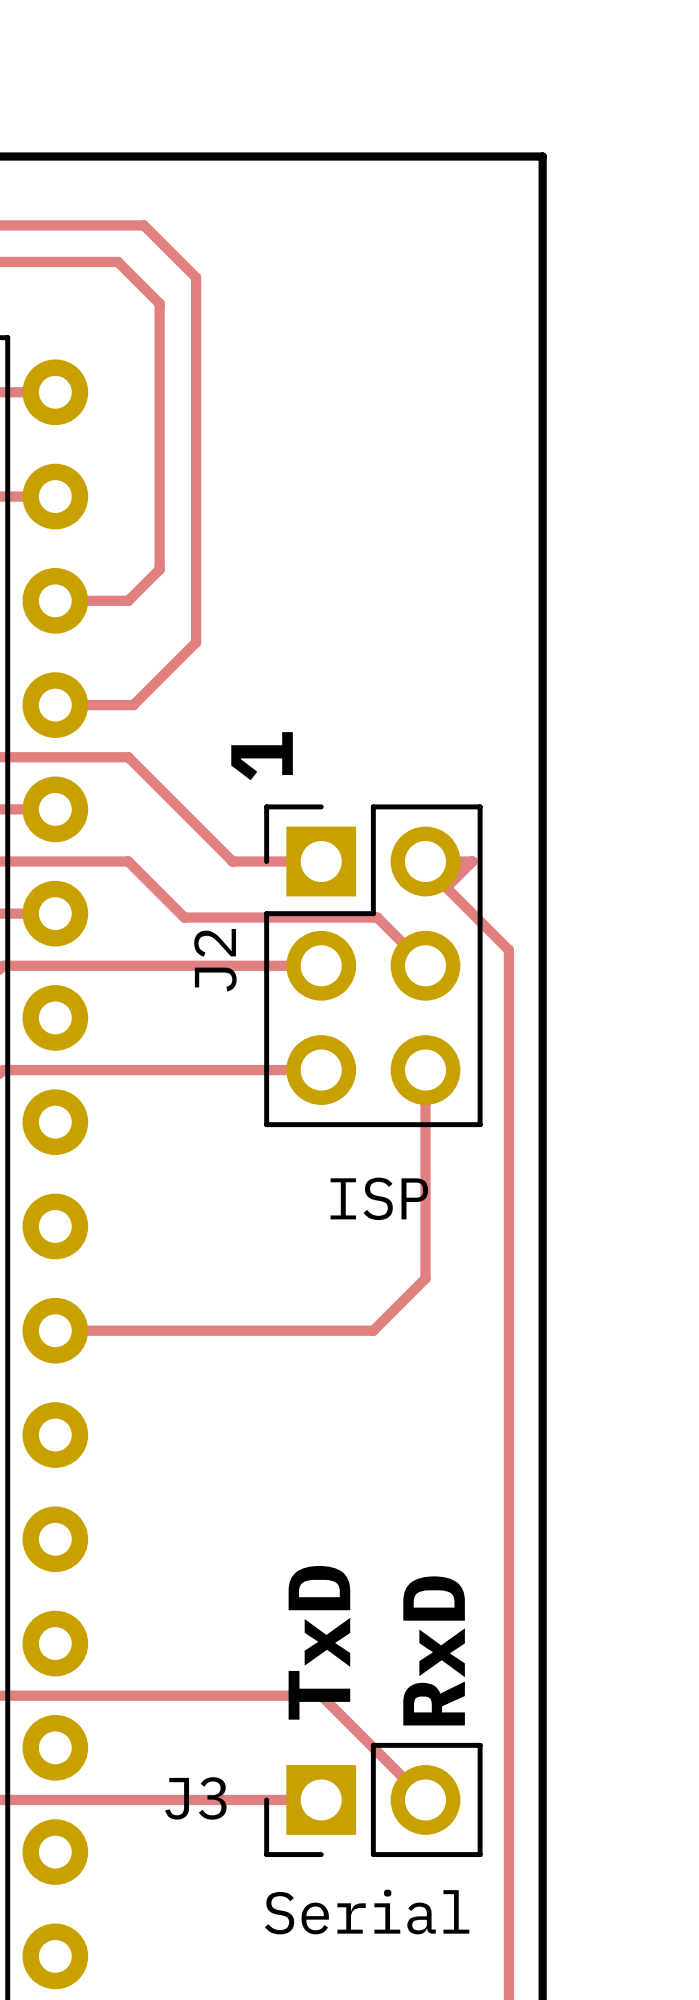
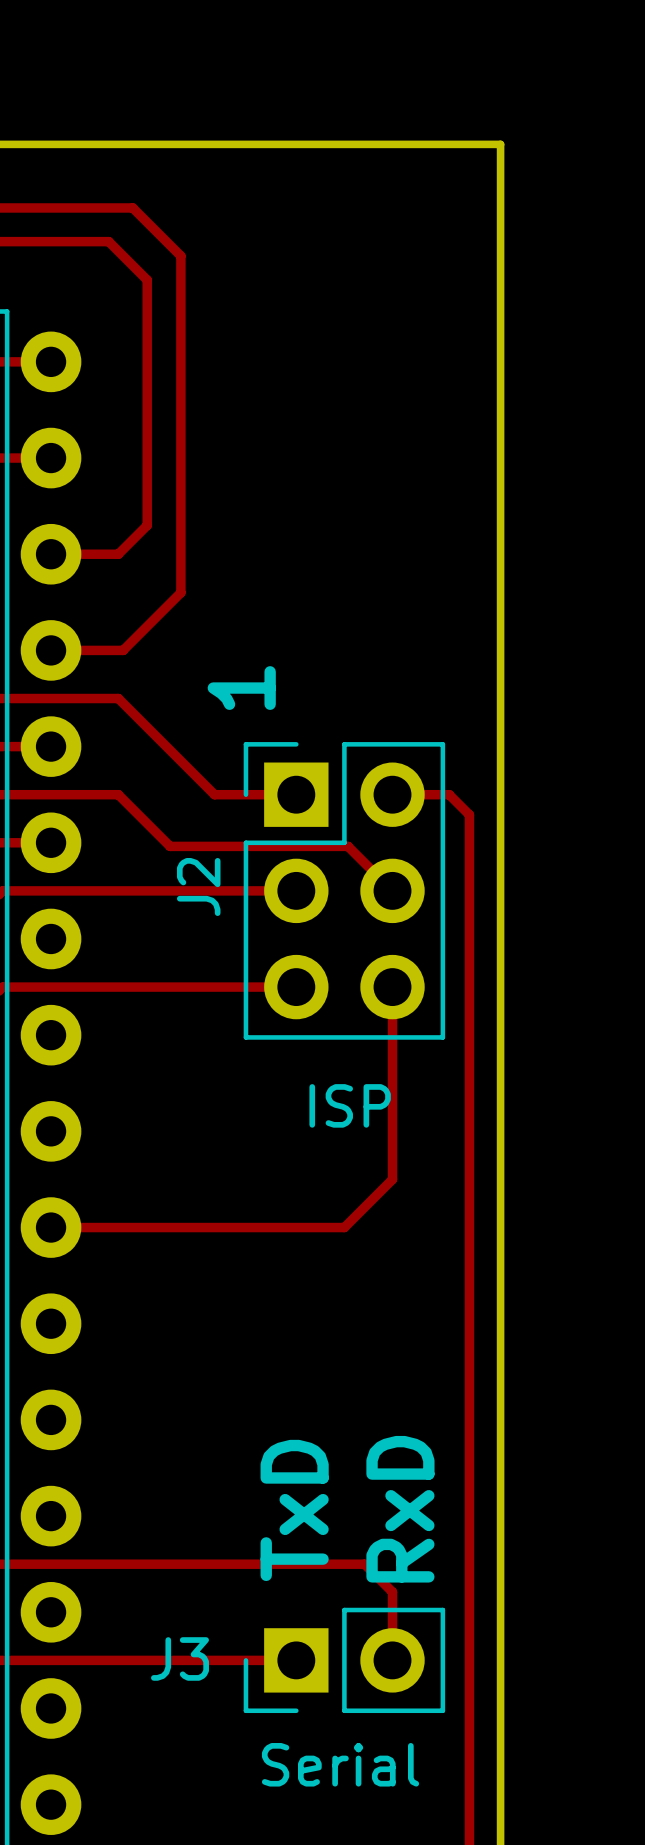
track: (472, 861) (446, 887) (508, 950) -> (435, 794) (449, 794) (469, 814) (469, 876)
track: (321, 1695) (425, 1799) -> (296, 1564) (364, 1564) (392, 1592) (392, 1660)

